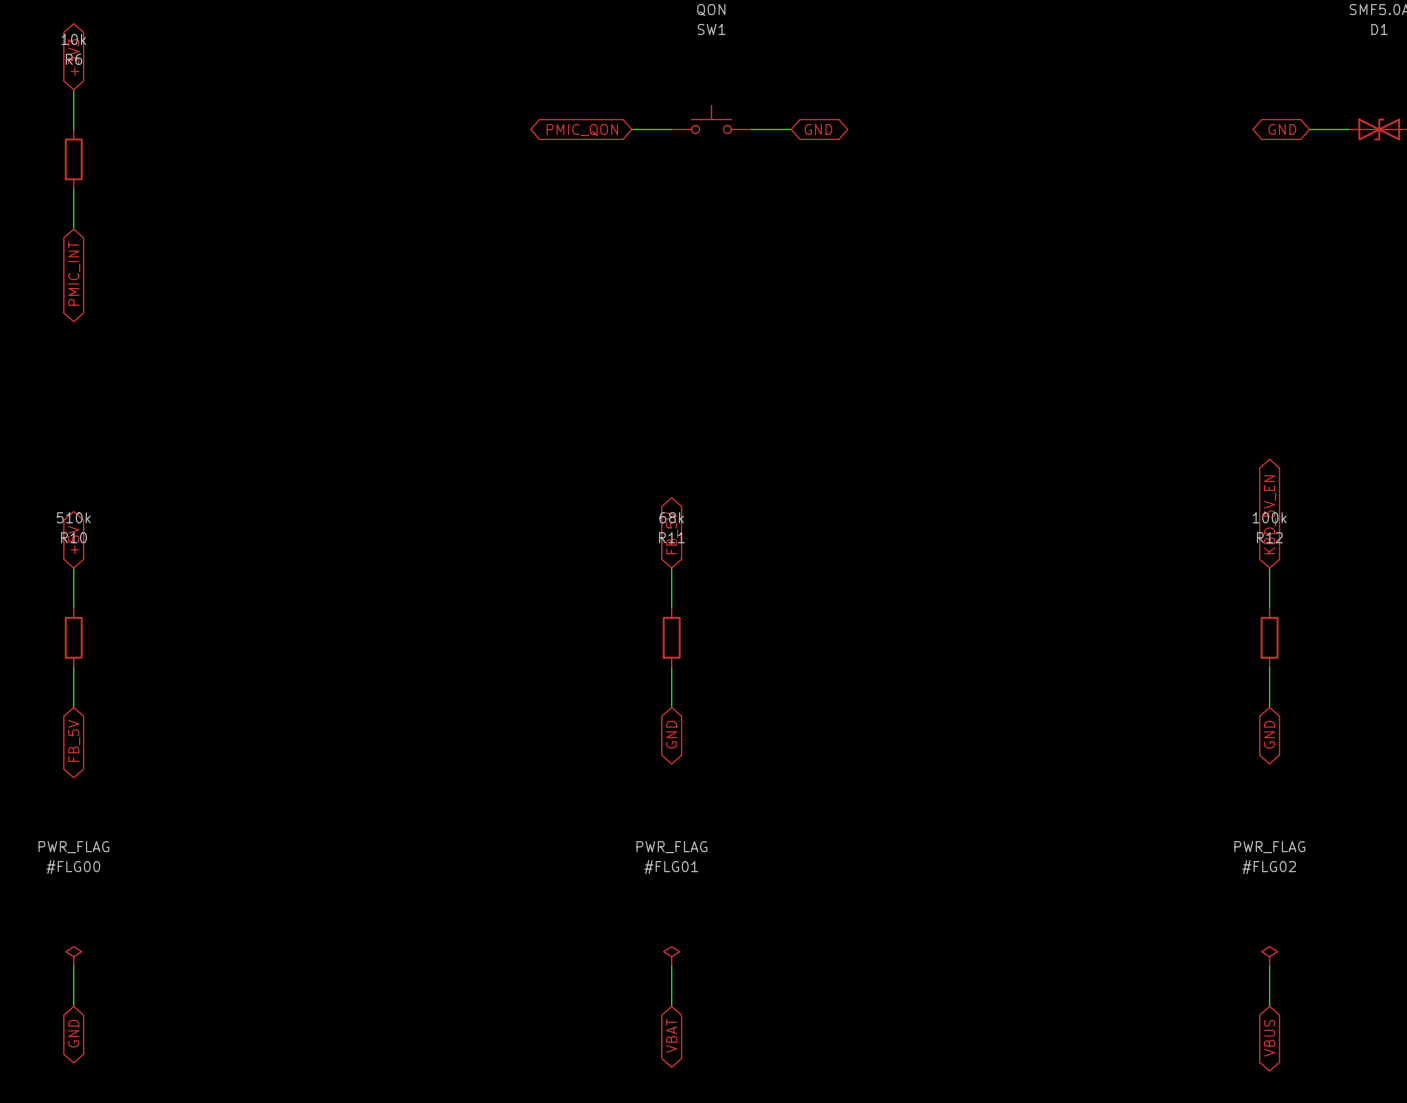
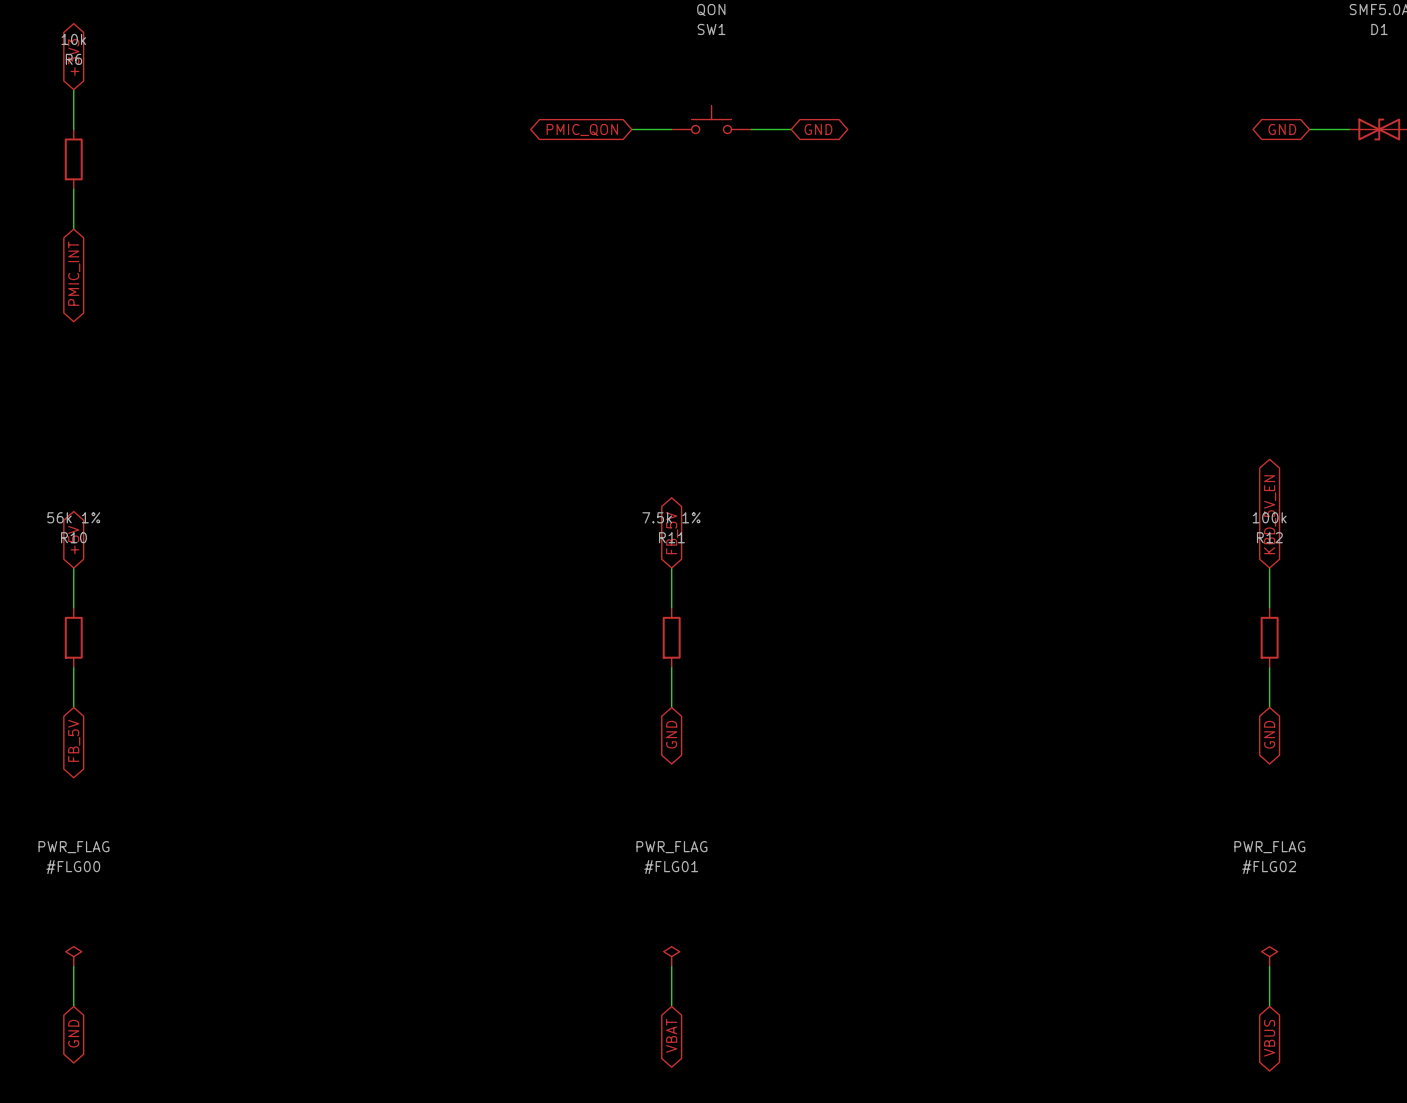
R10 value: 510k (73, 517) -> 56k 1% (73, 517)
R11 value: 68k (671, 517) -> 7.5k 1% (671, 517)

